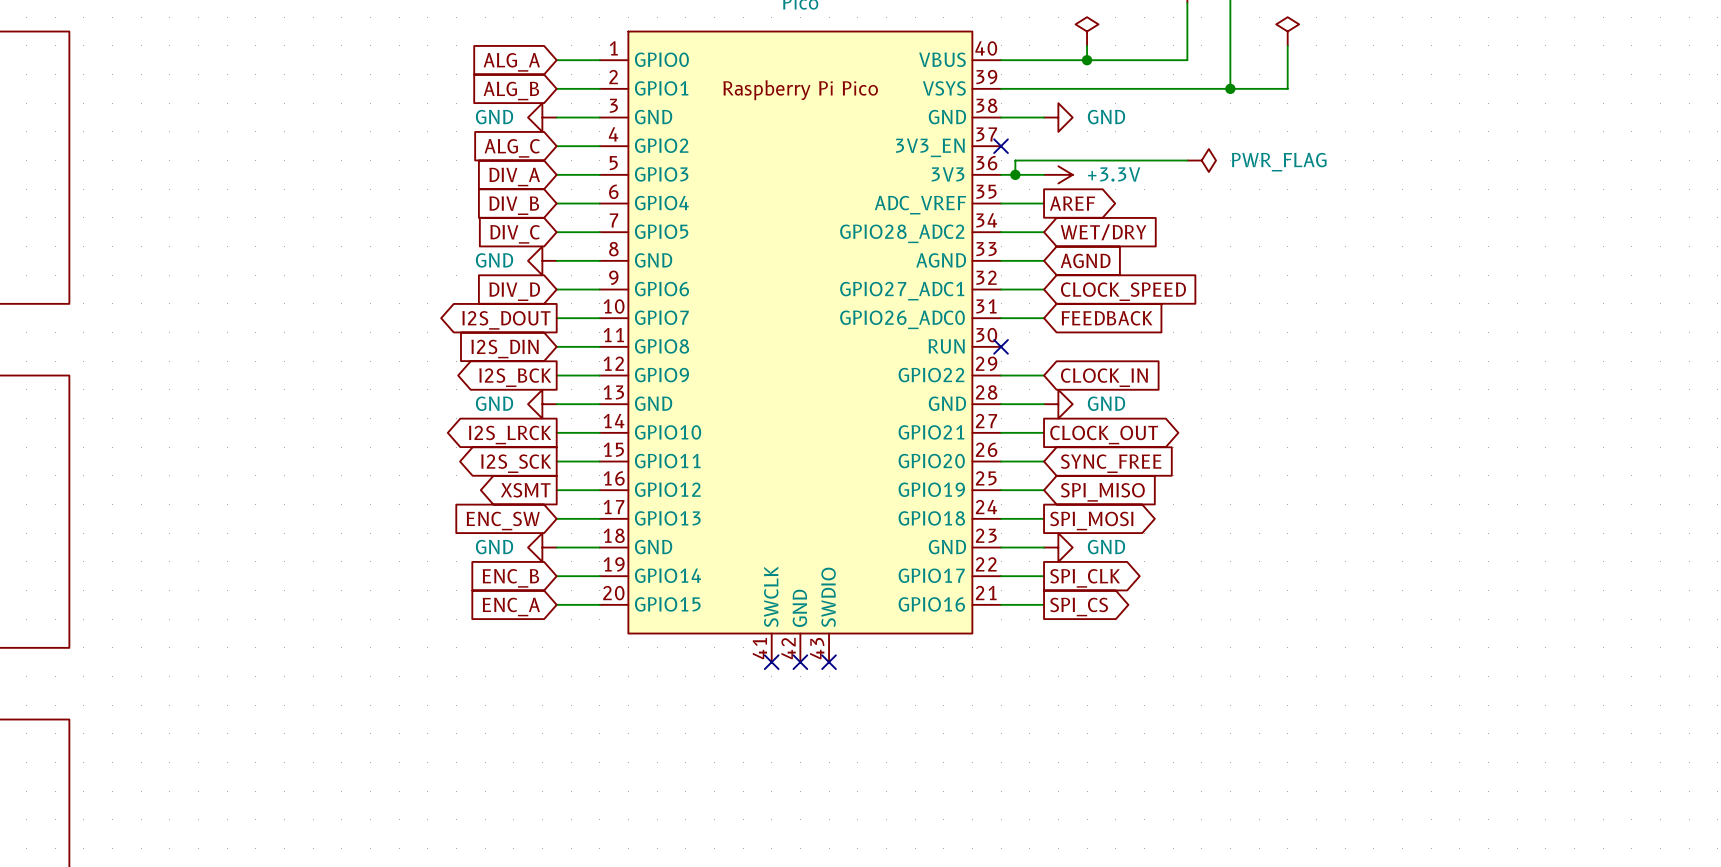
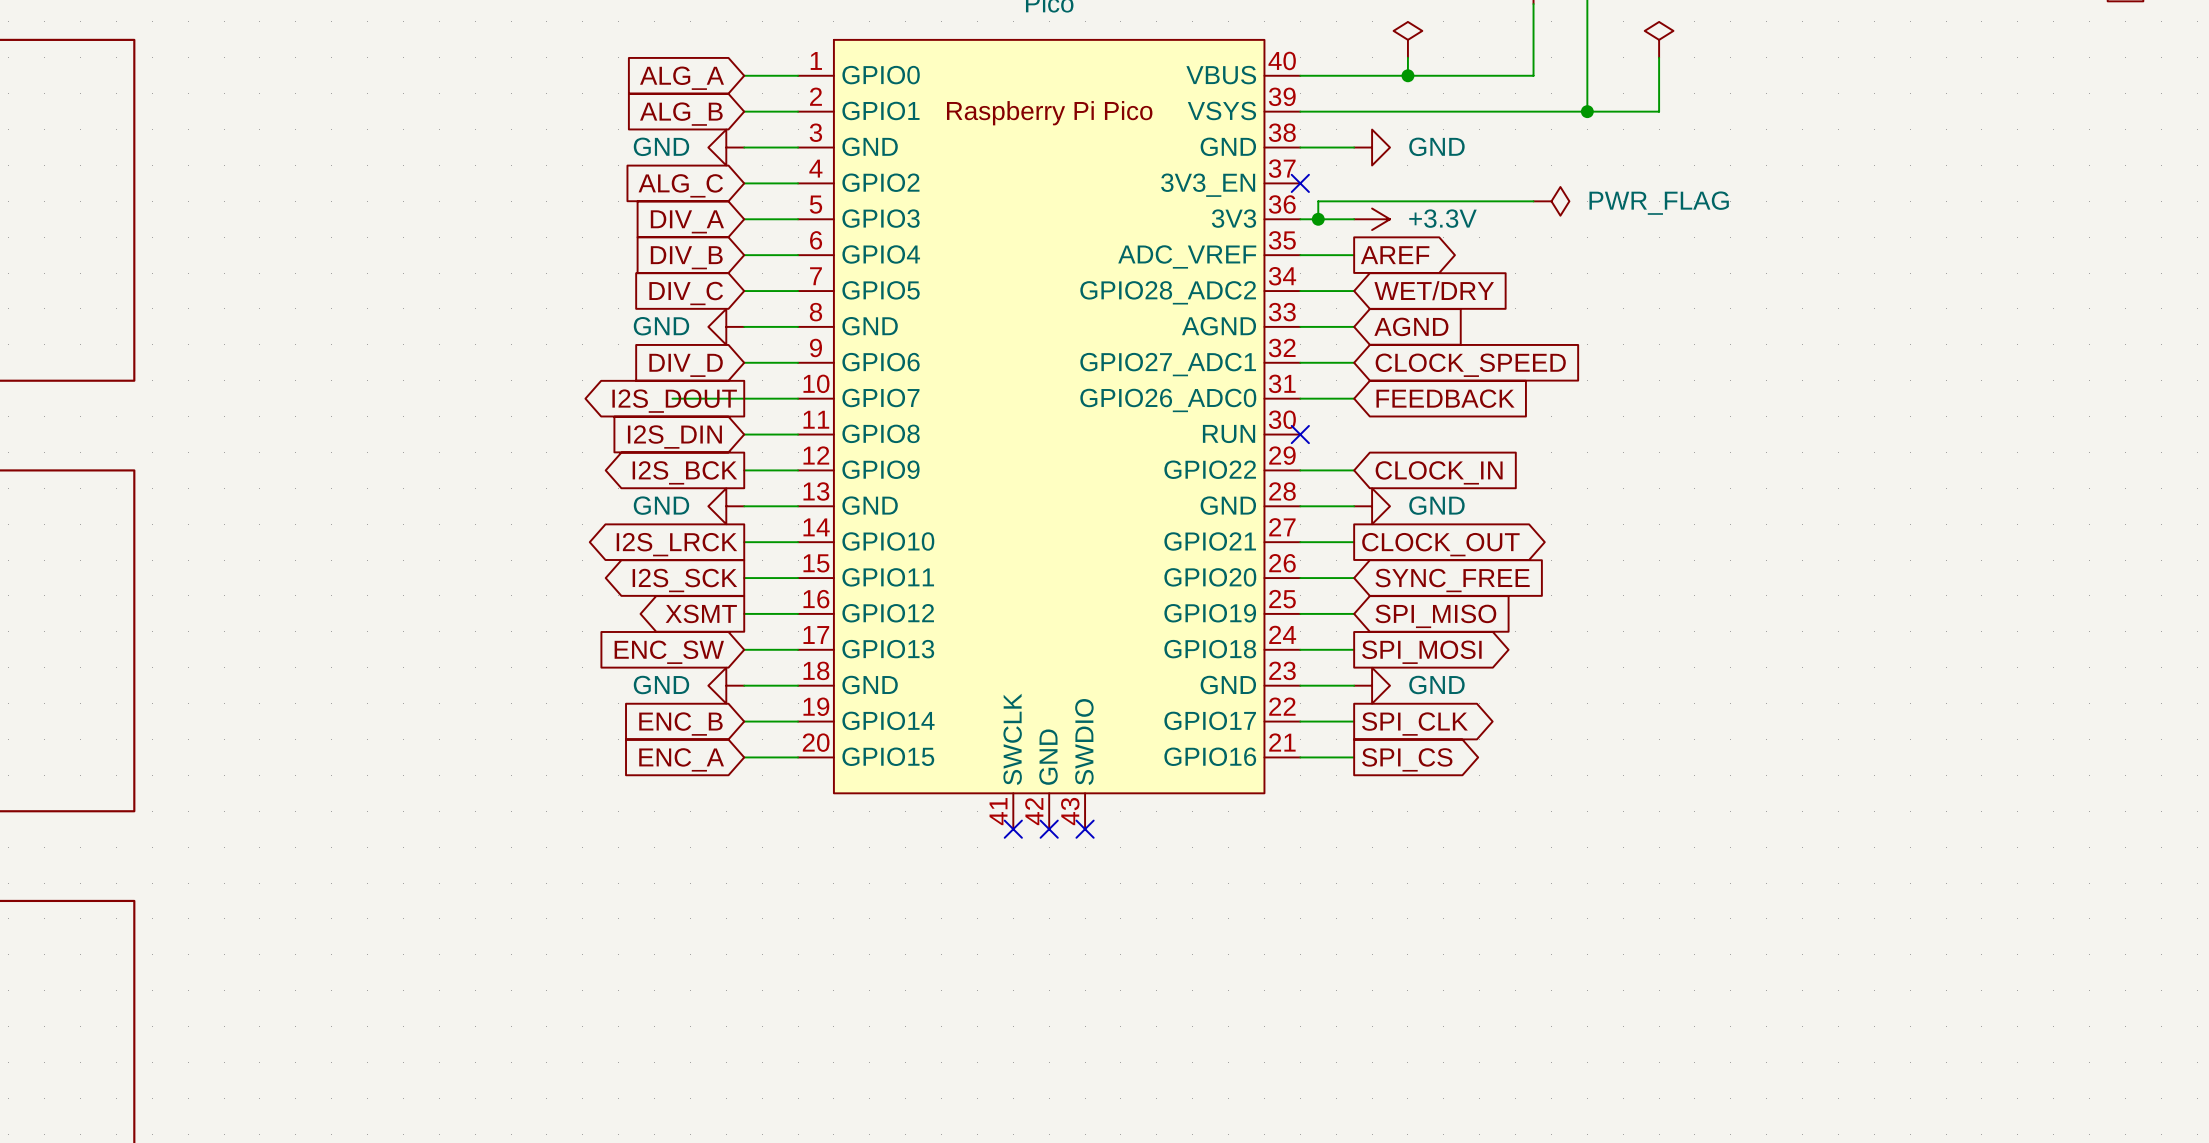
wire: none -> (672, 398) (744, 398)

